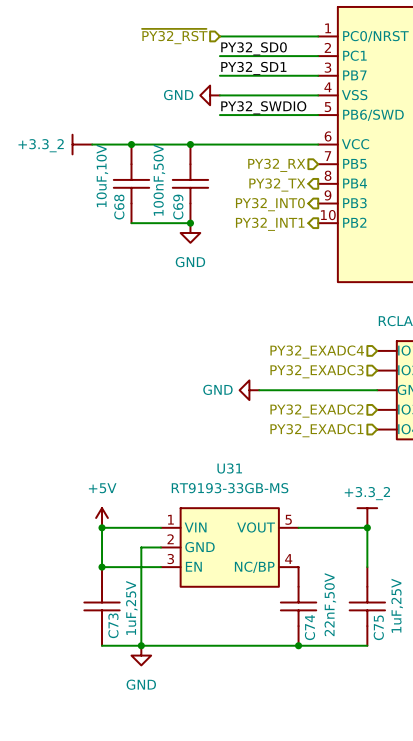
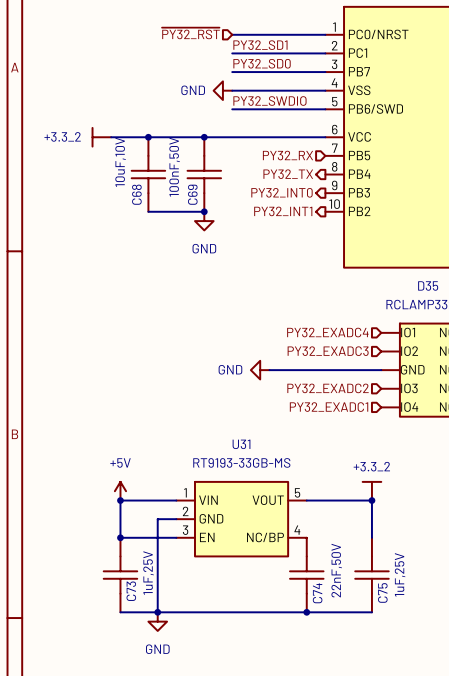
label: PY32_SD0 (254, 48) -> PY32_SD1 (260, 45)
label: PY32_SD1 (253, 68) -> PY32_SD0 (262, 63)

